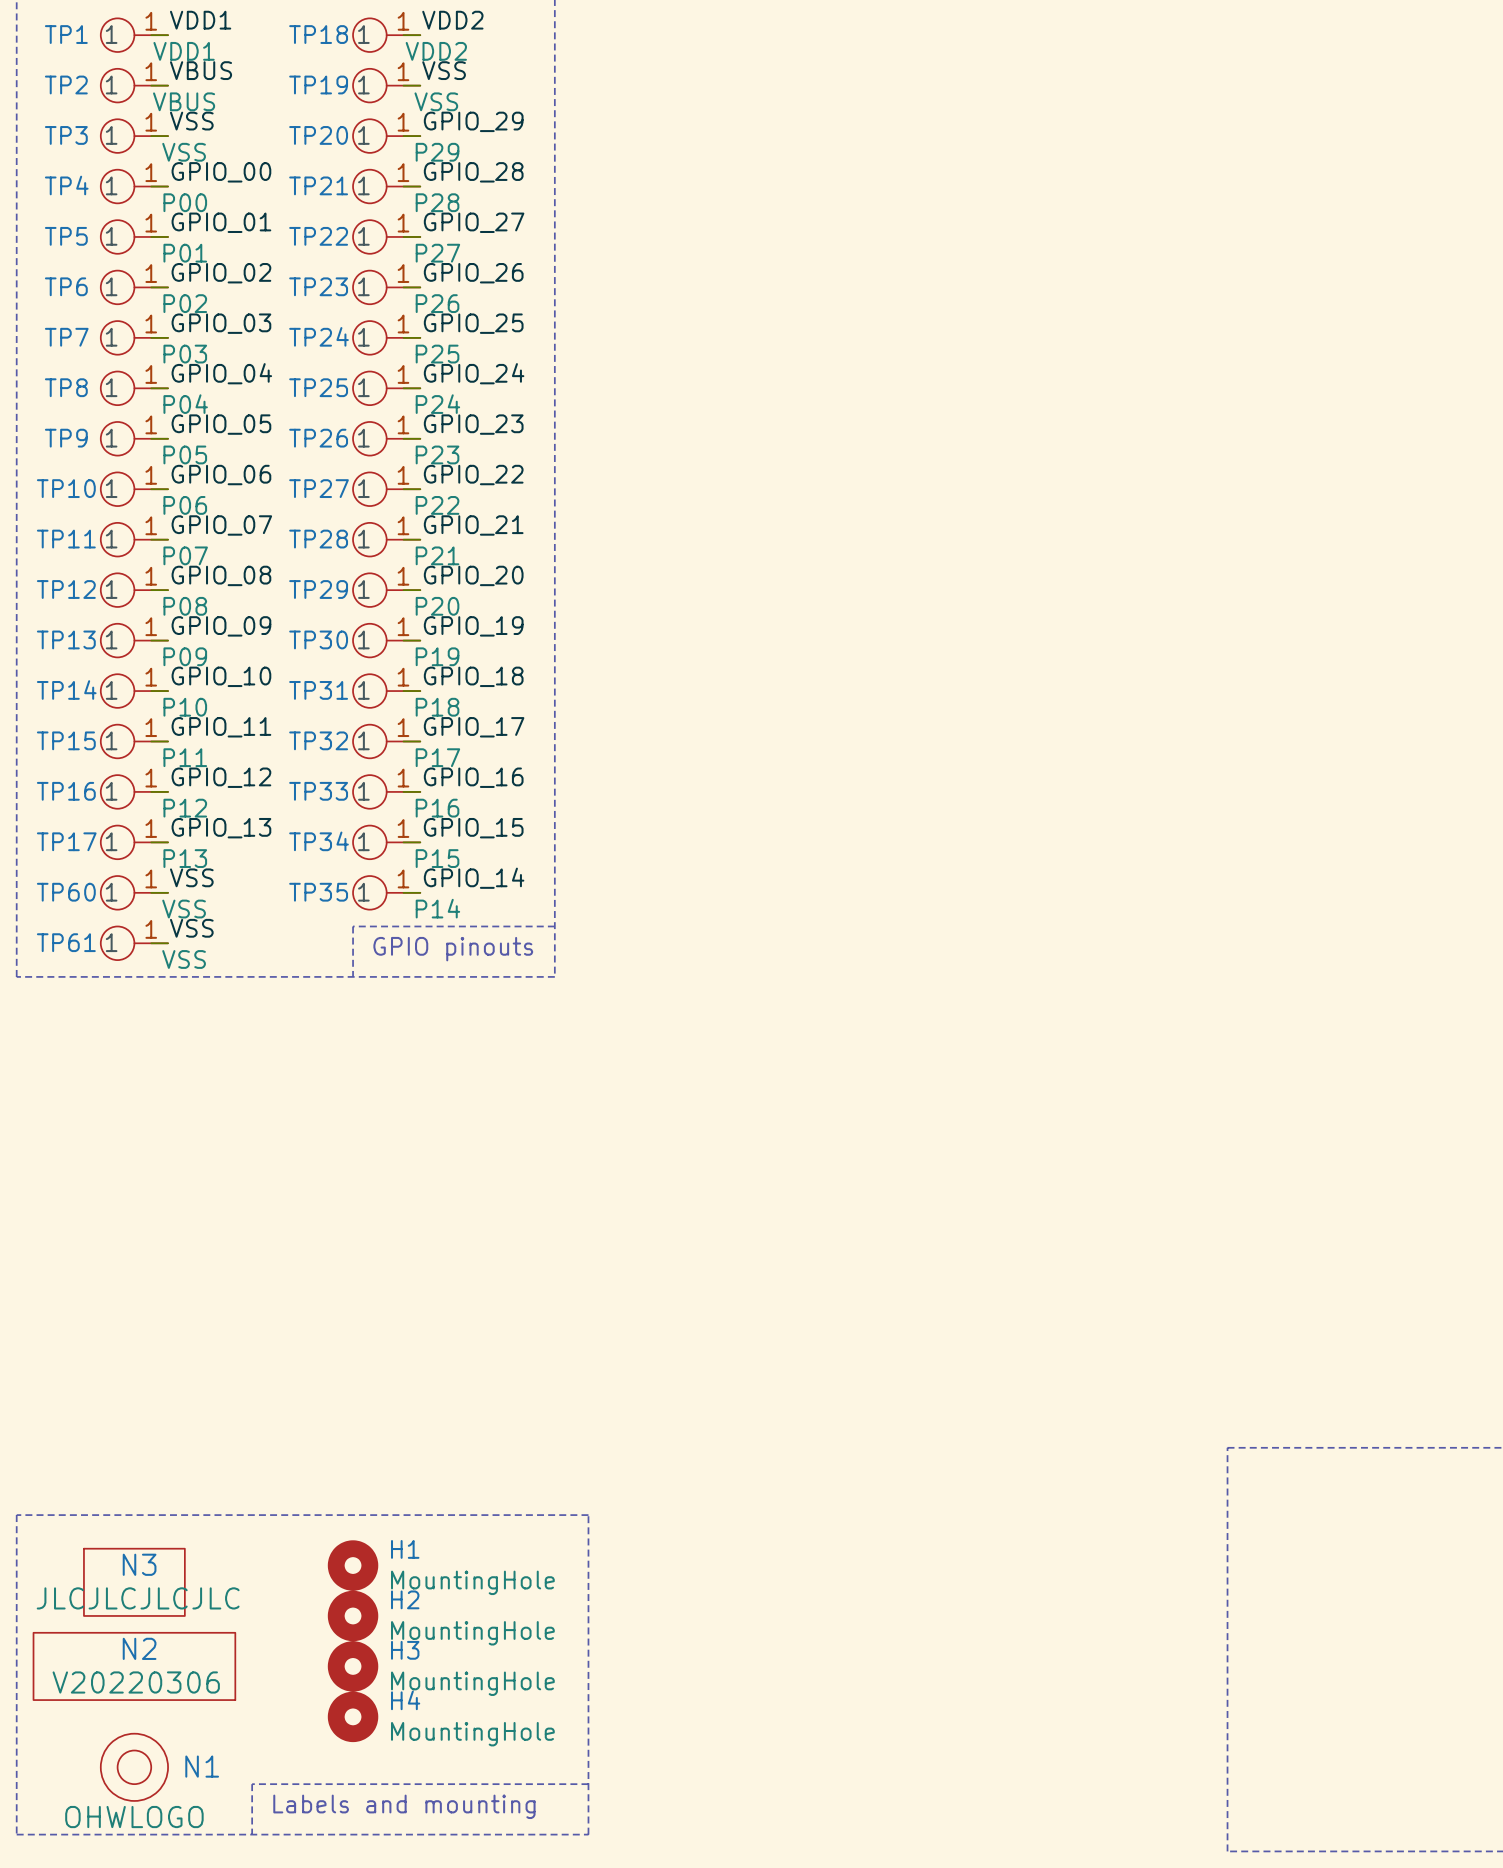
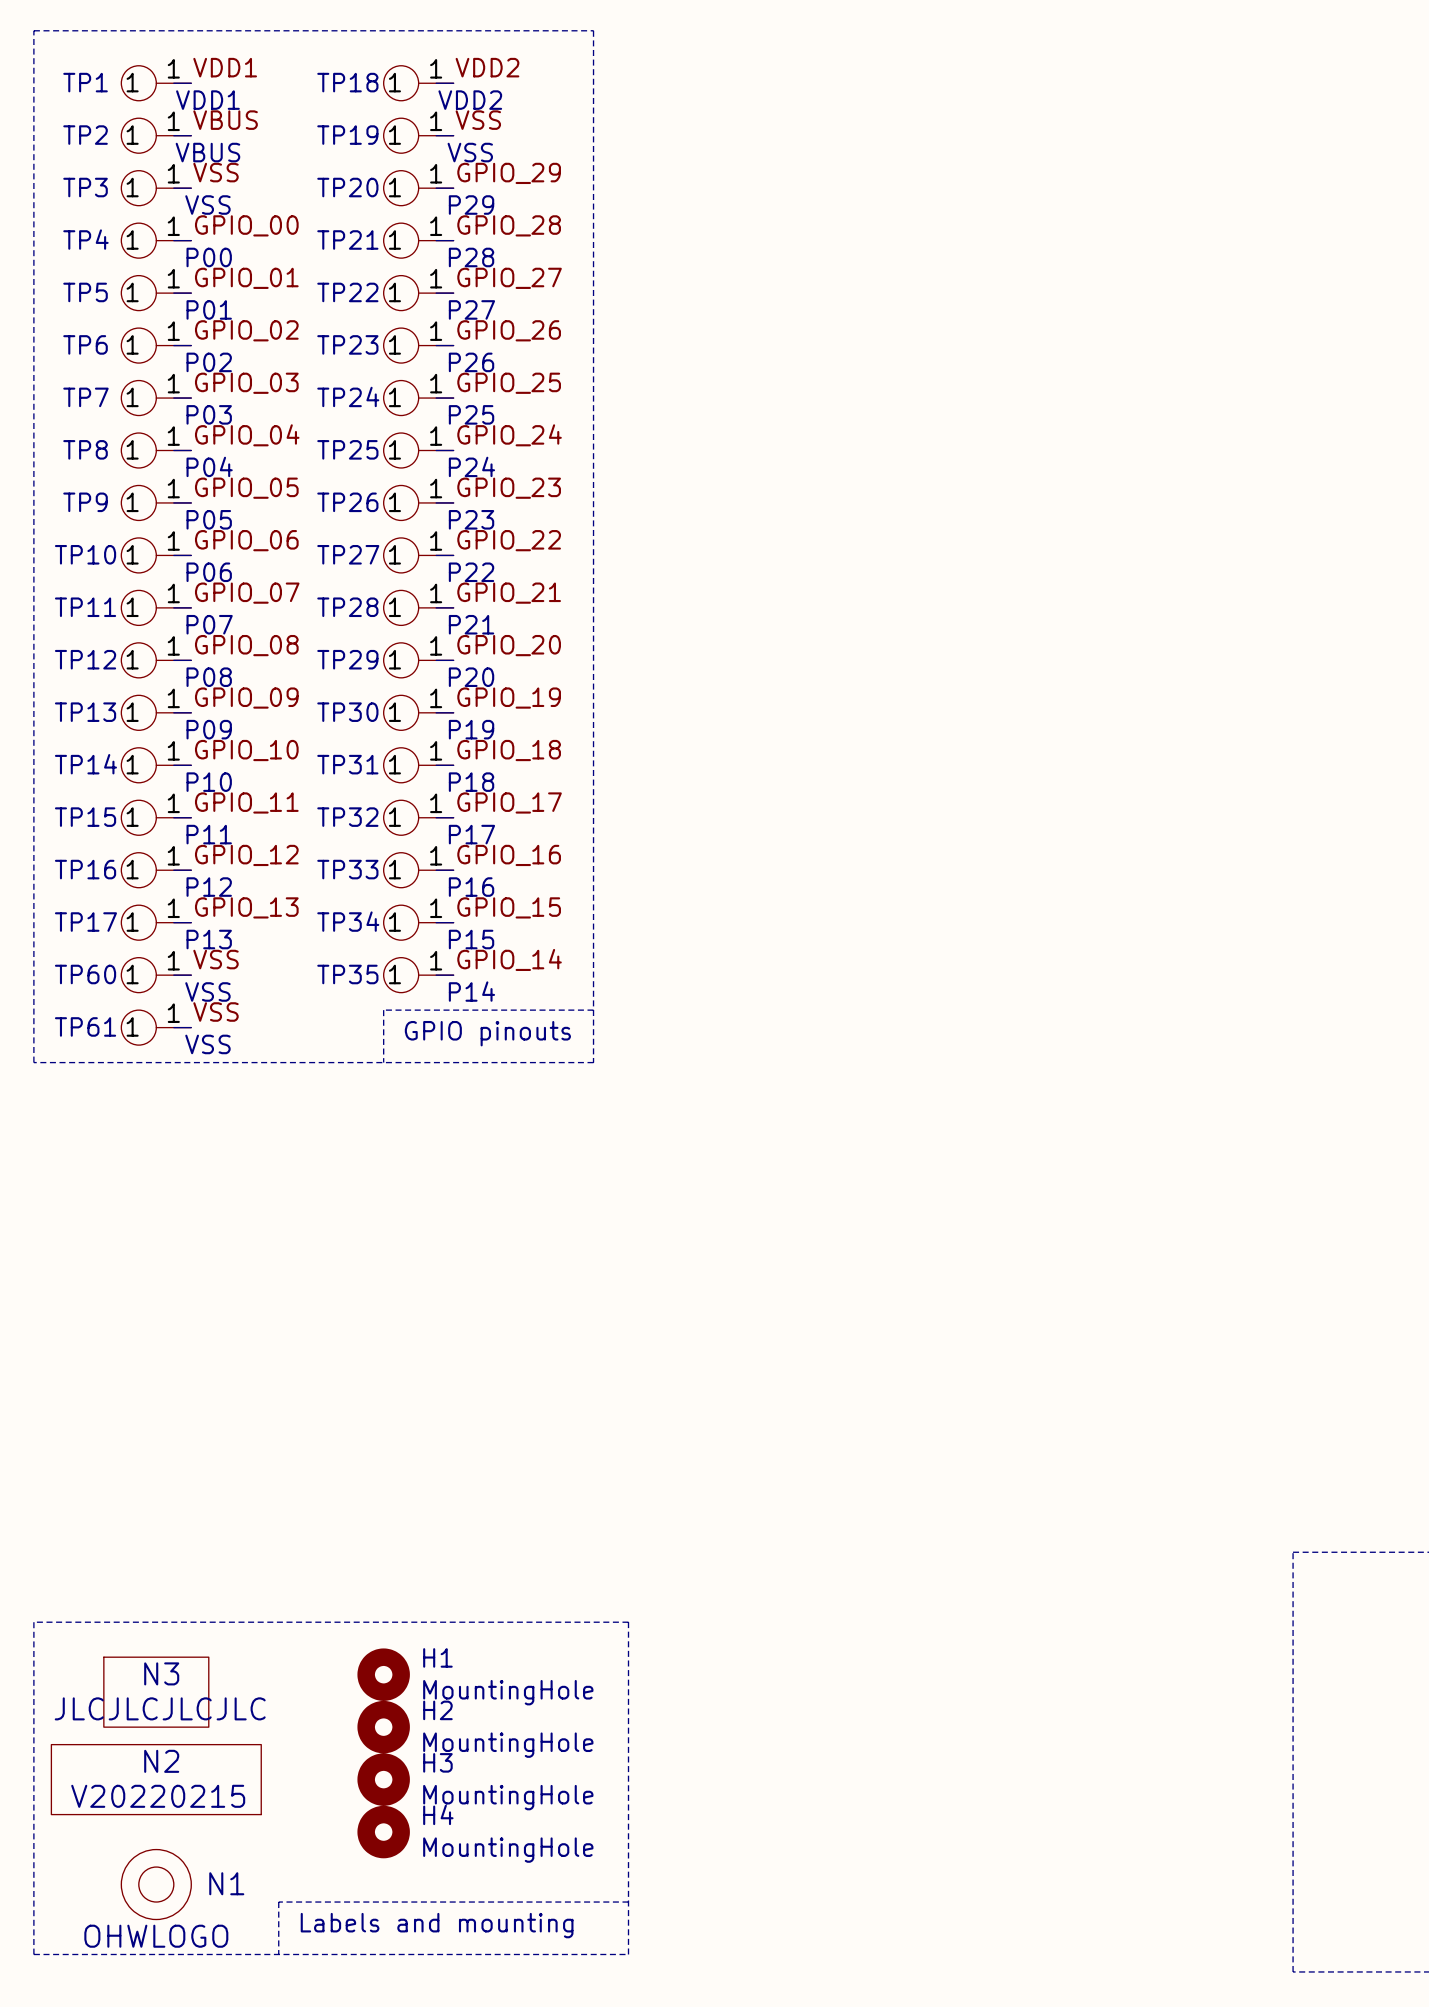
N2 value: V20220306 (136, 1682) -> V20220215 (158, 1796)

